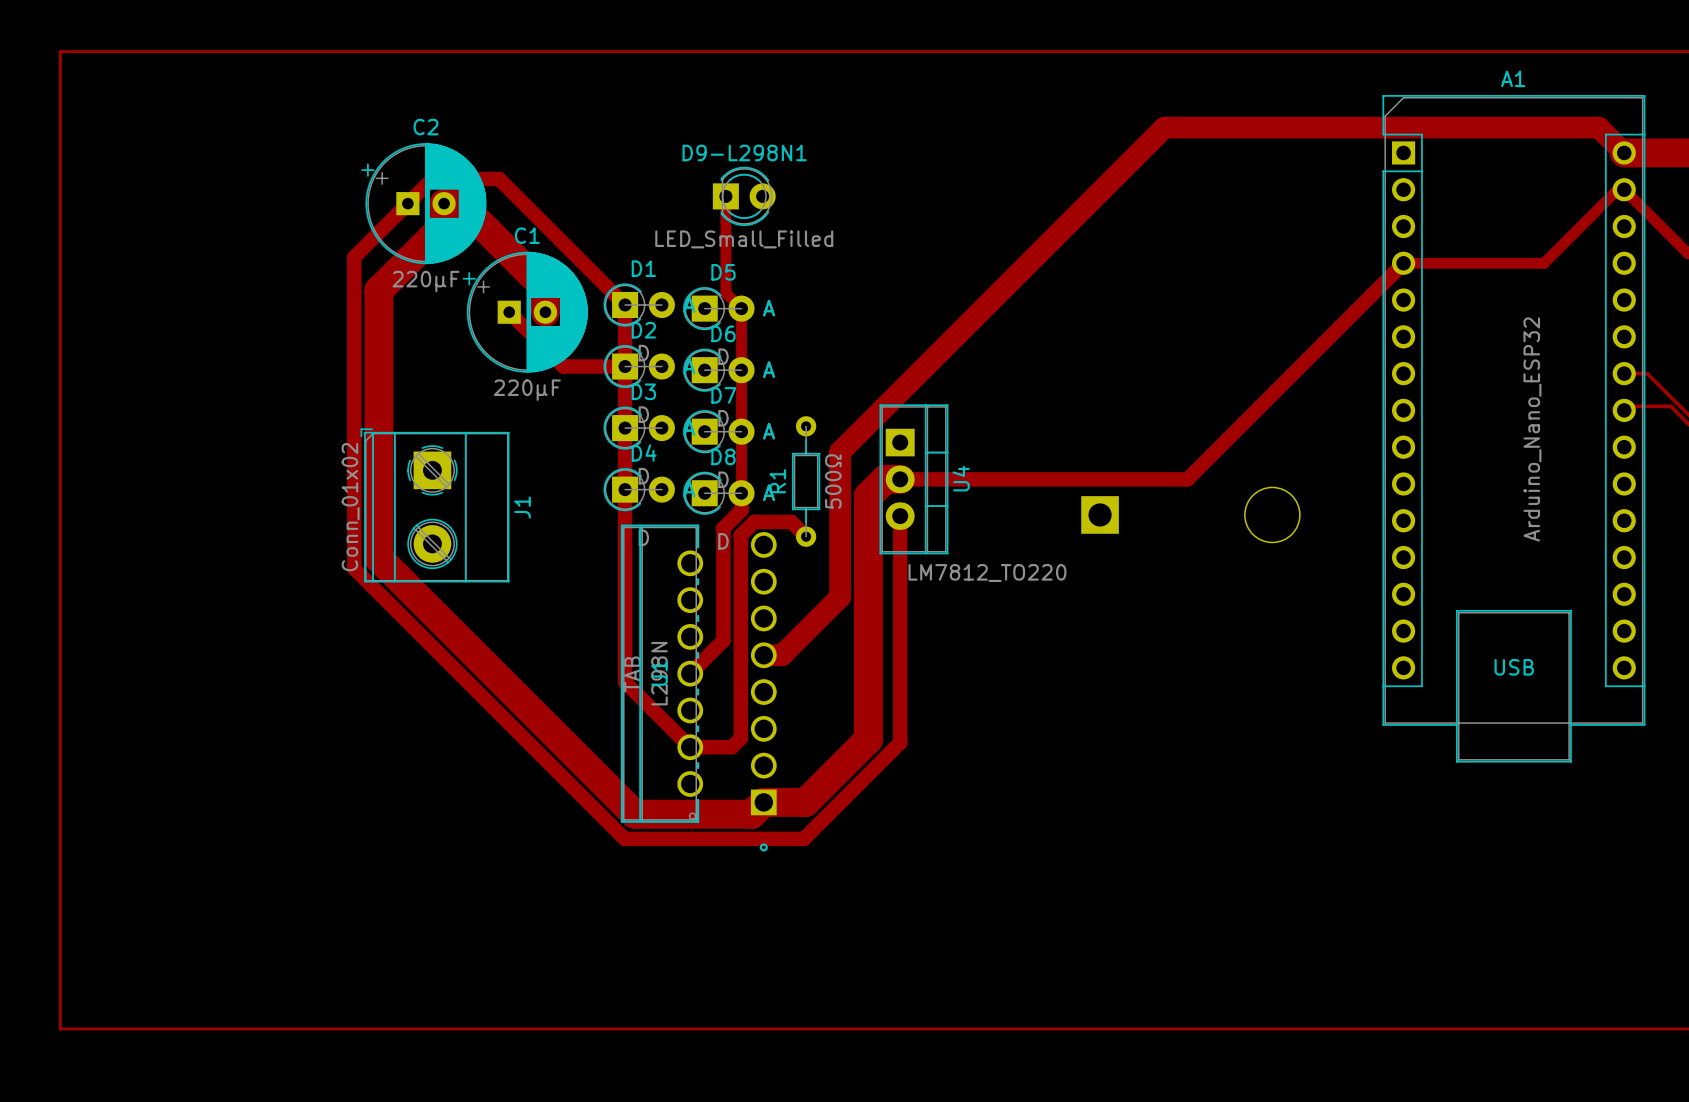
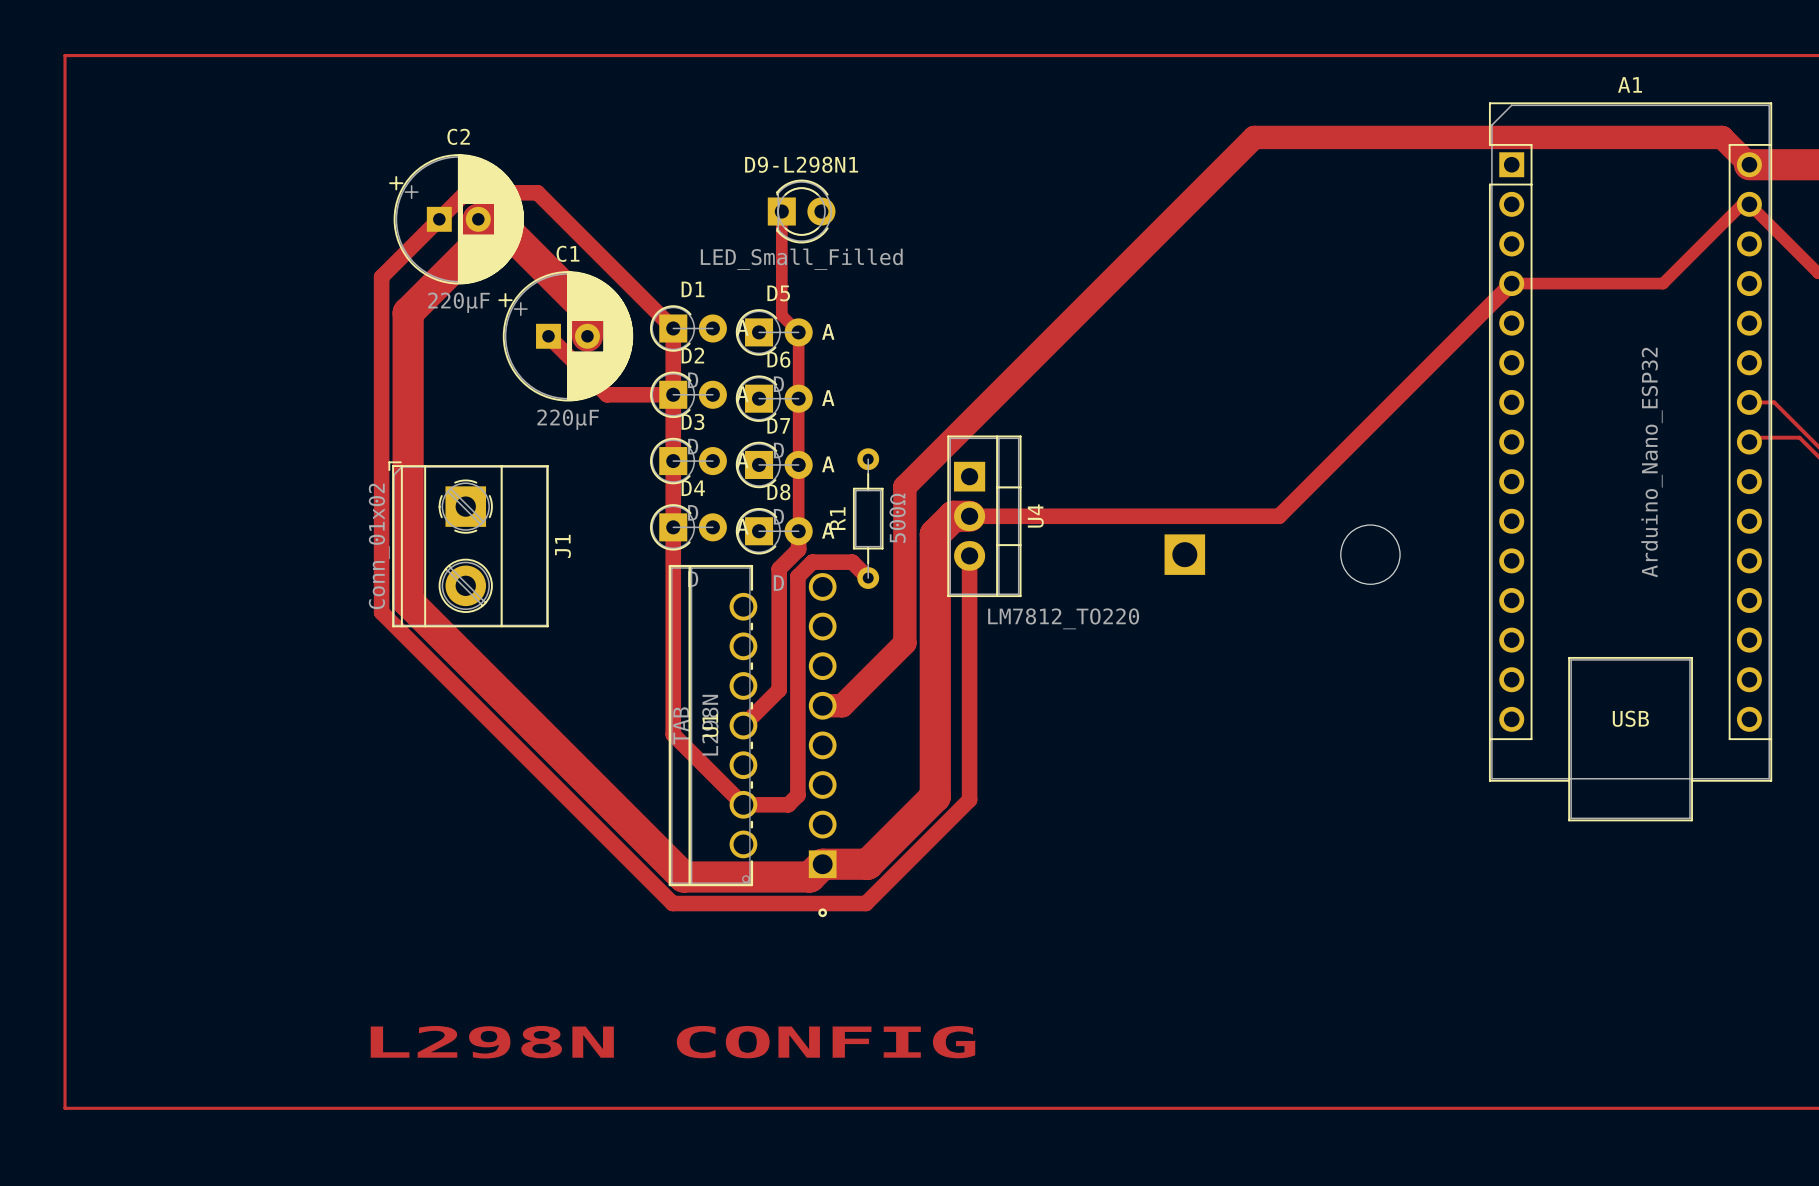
text: none -> L298N CONFIG (672, 1042)

